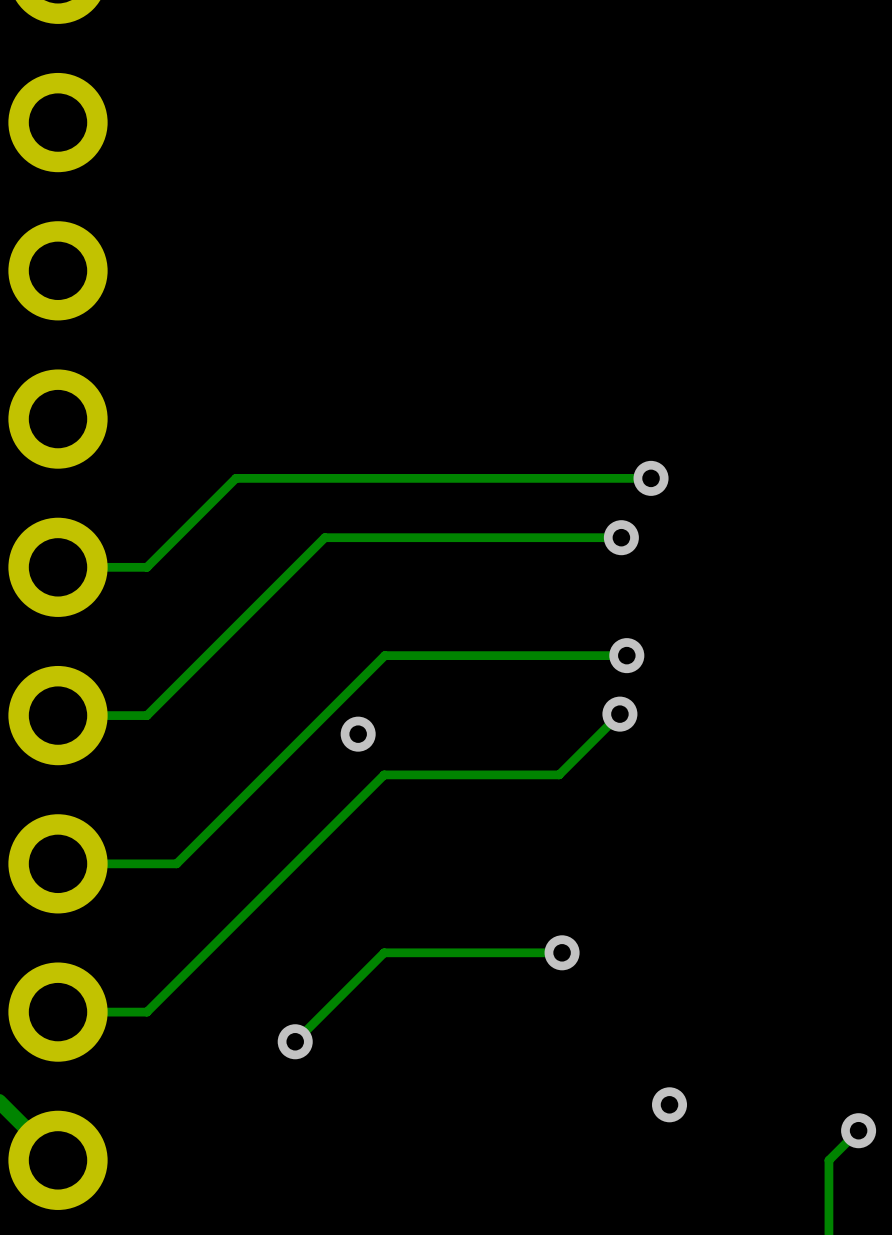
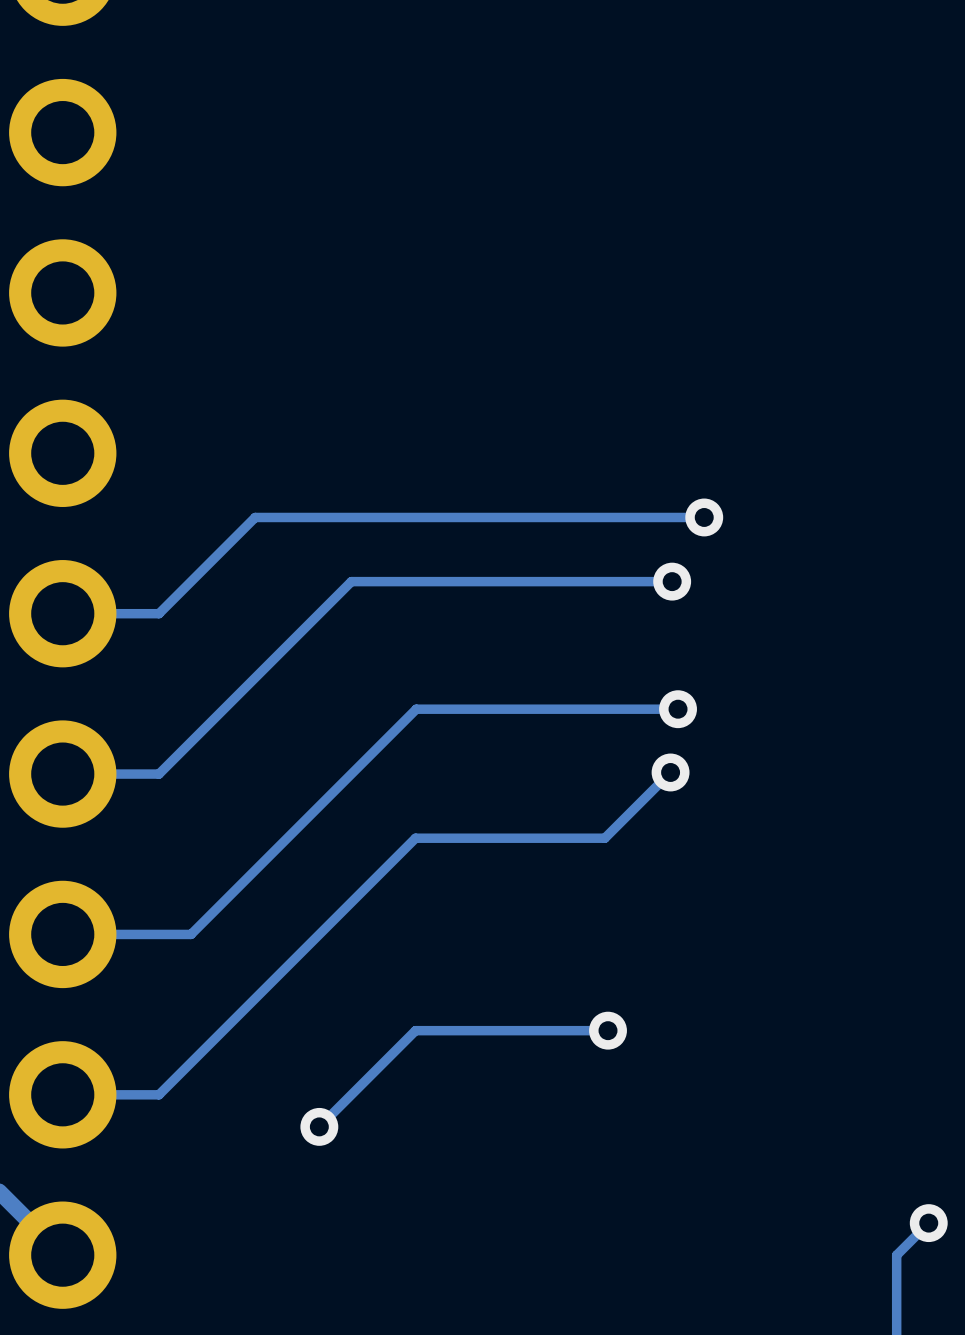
via: (358, 734) -> none
via: (669, 1104) -> none

